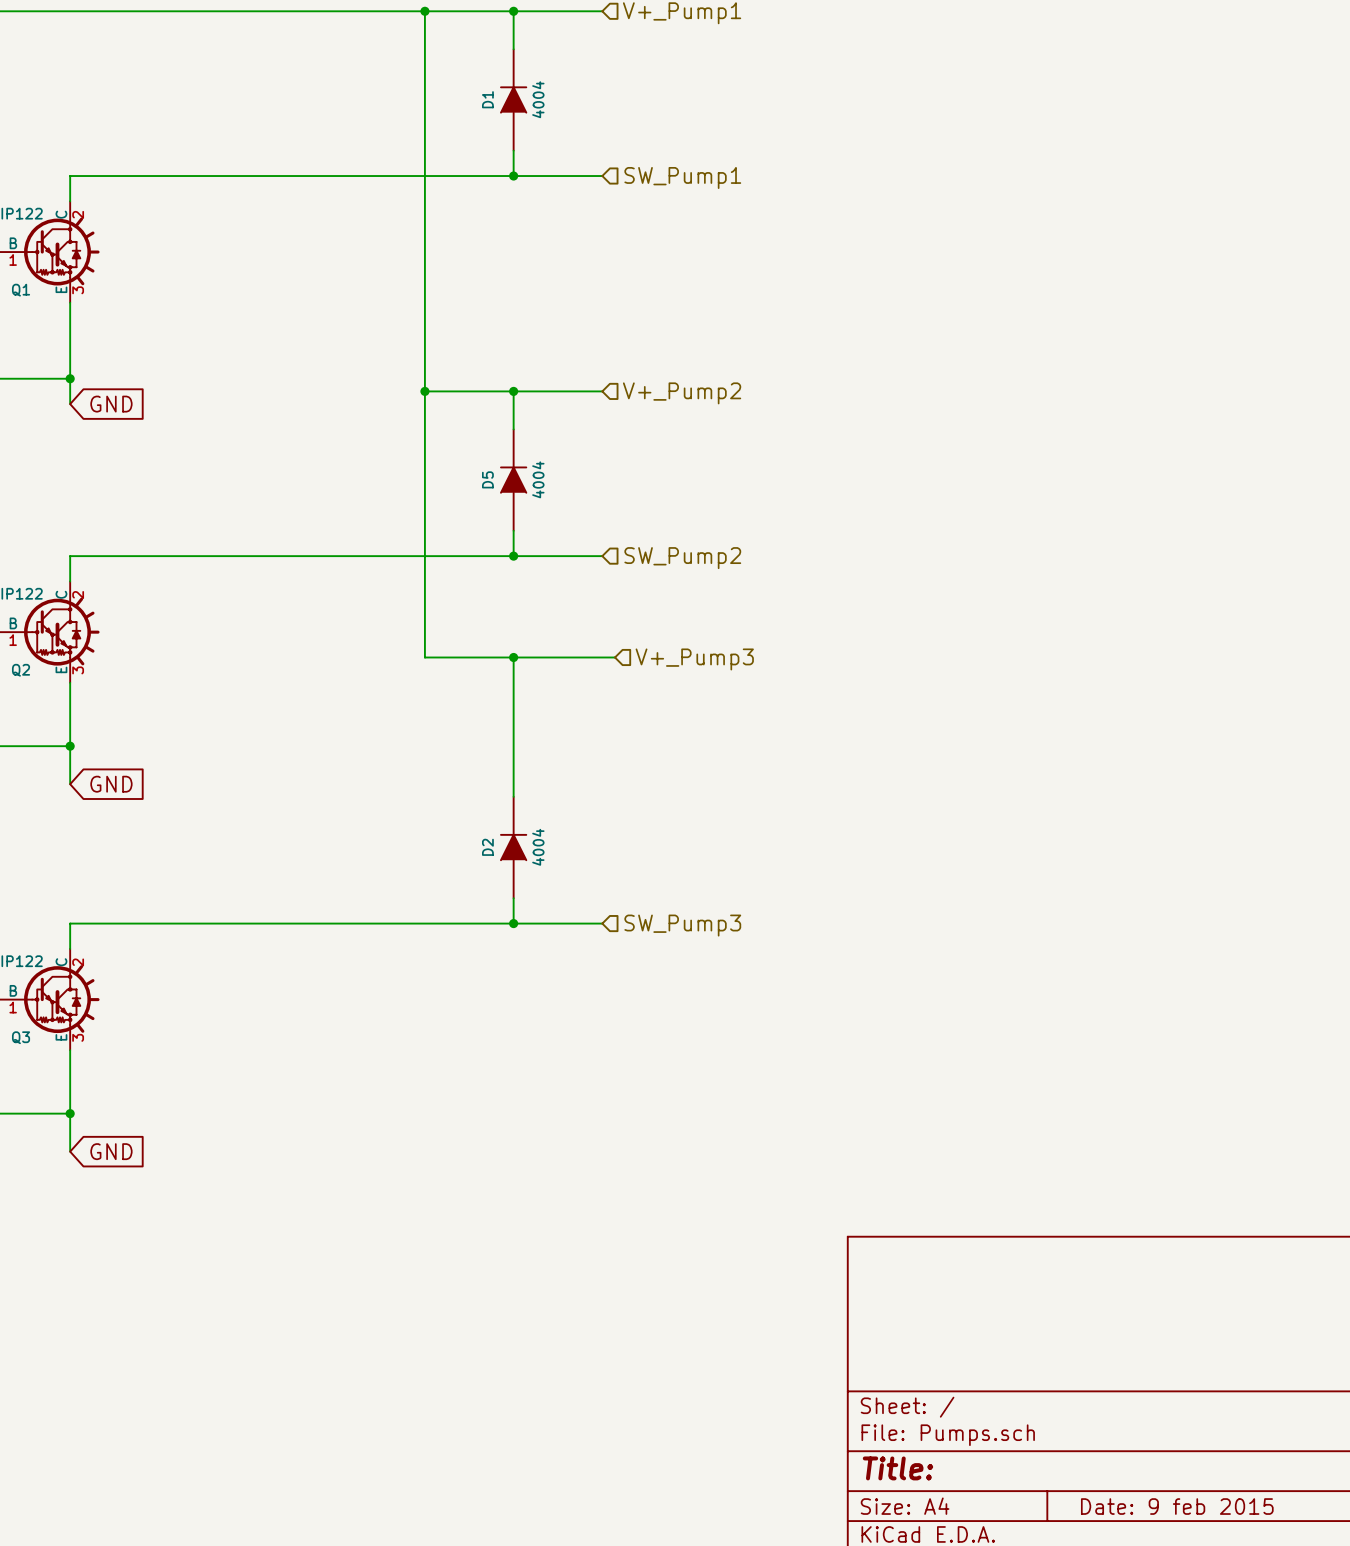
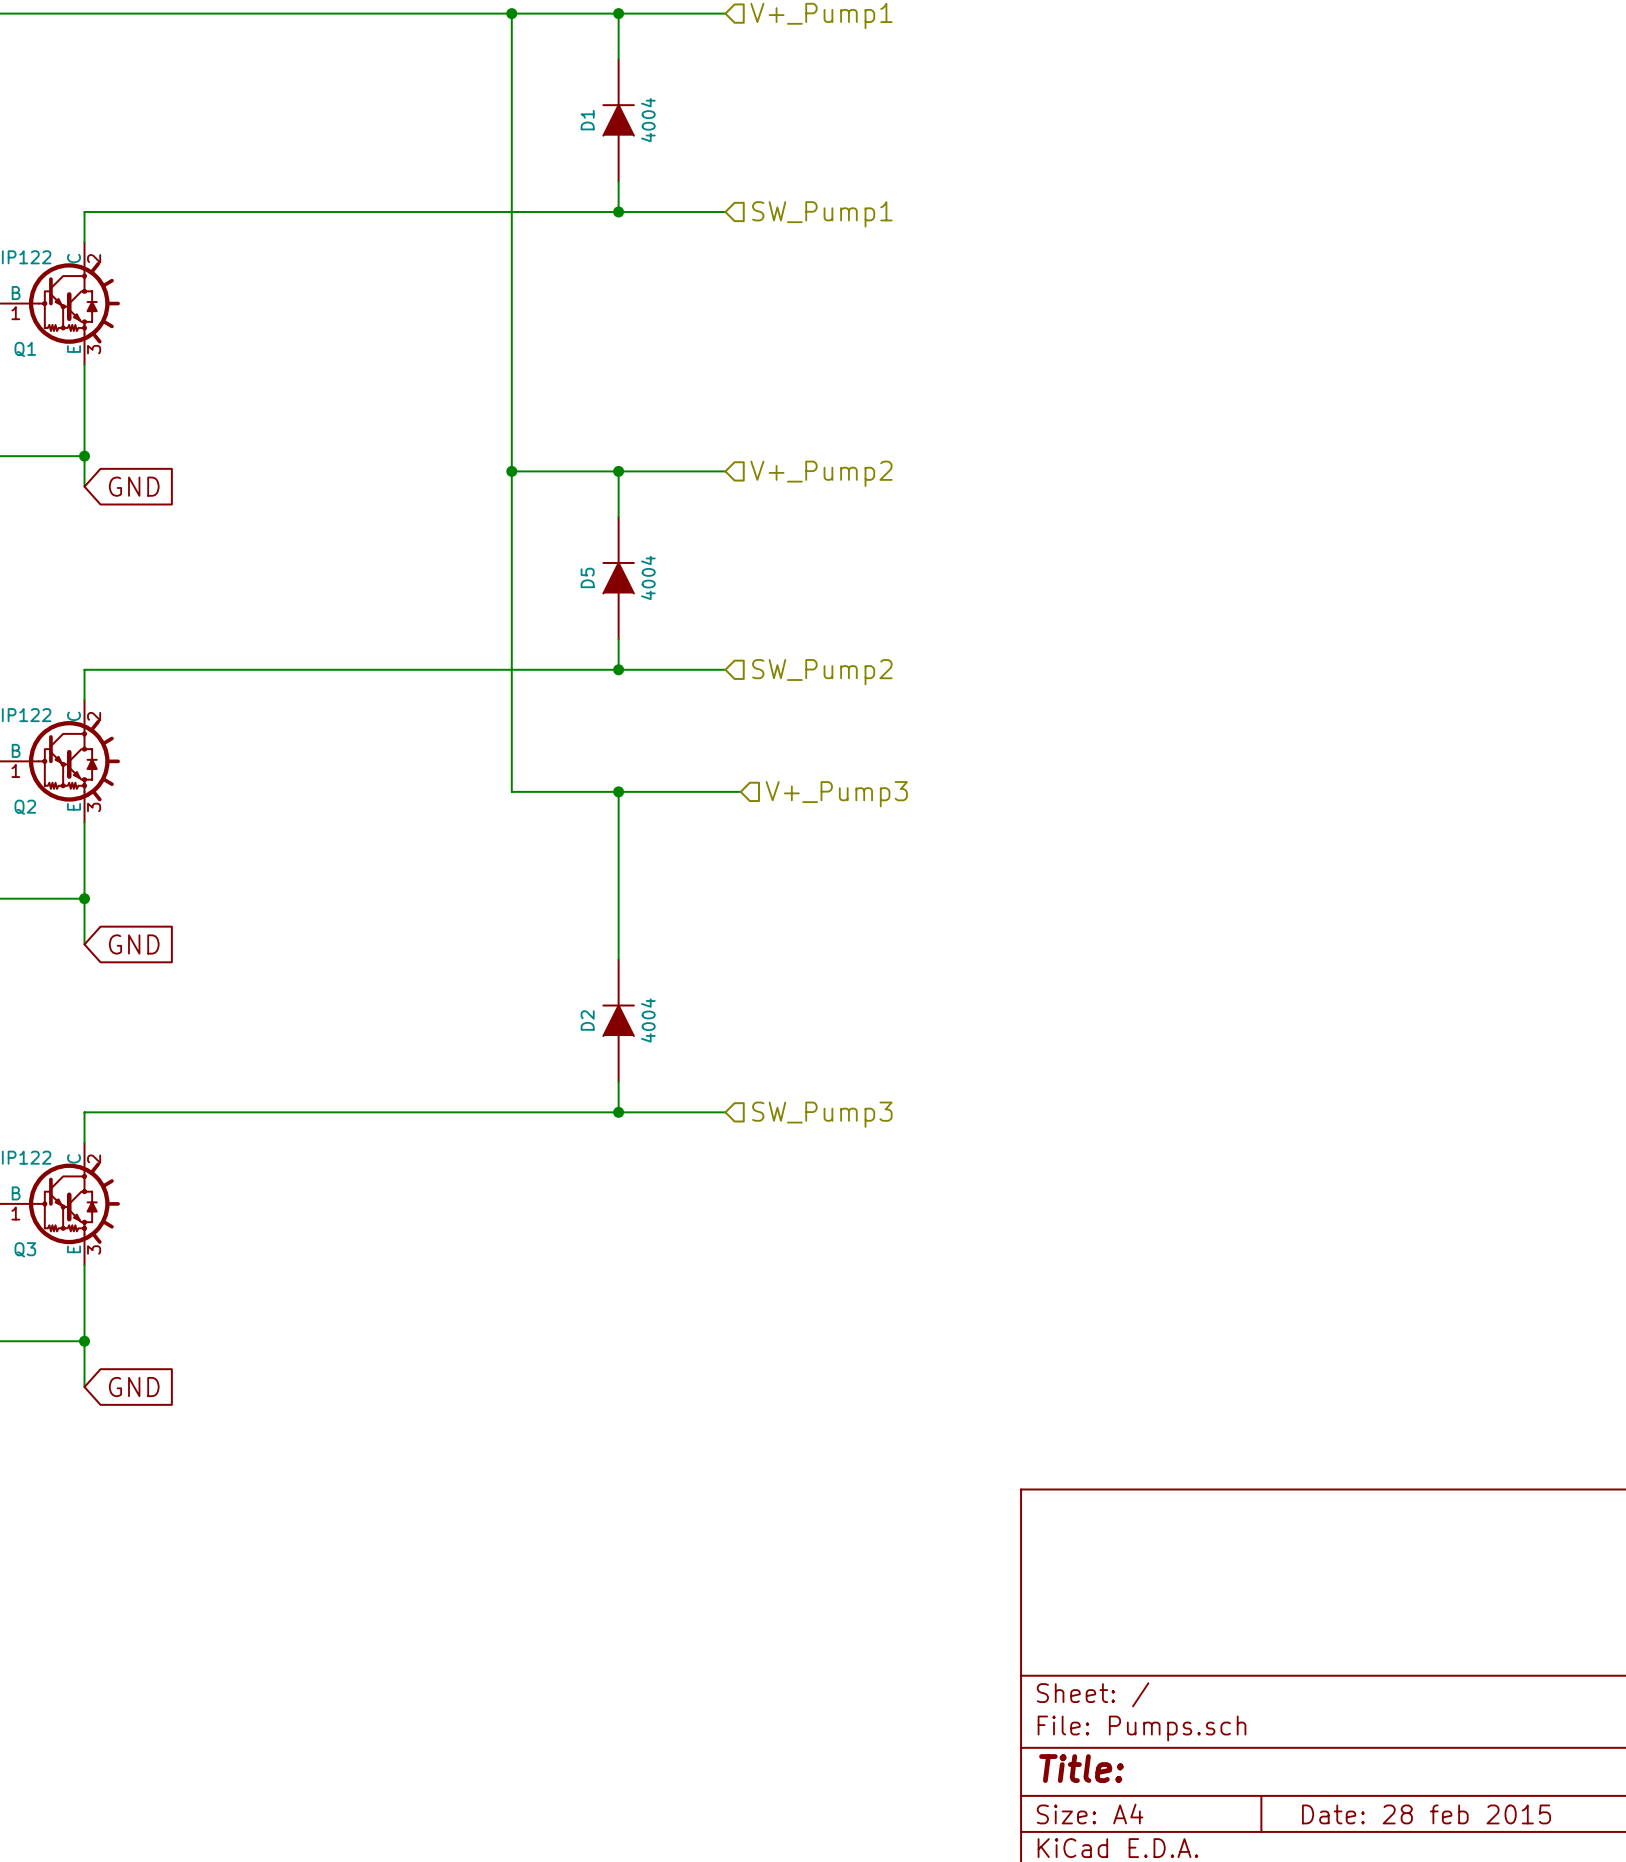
title block: Date: 9 feb 2015 (1177, 1506) -> Date: 28 feb 2015 (1426, 1814)

